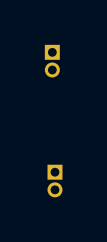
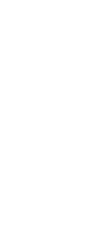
part: (52, 61) -> none
part: (54, 181) -> none

